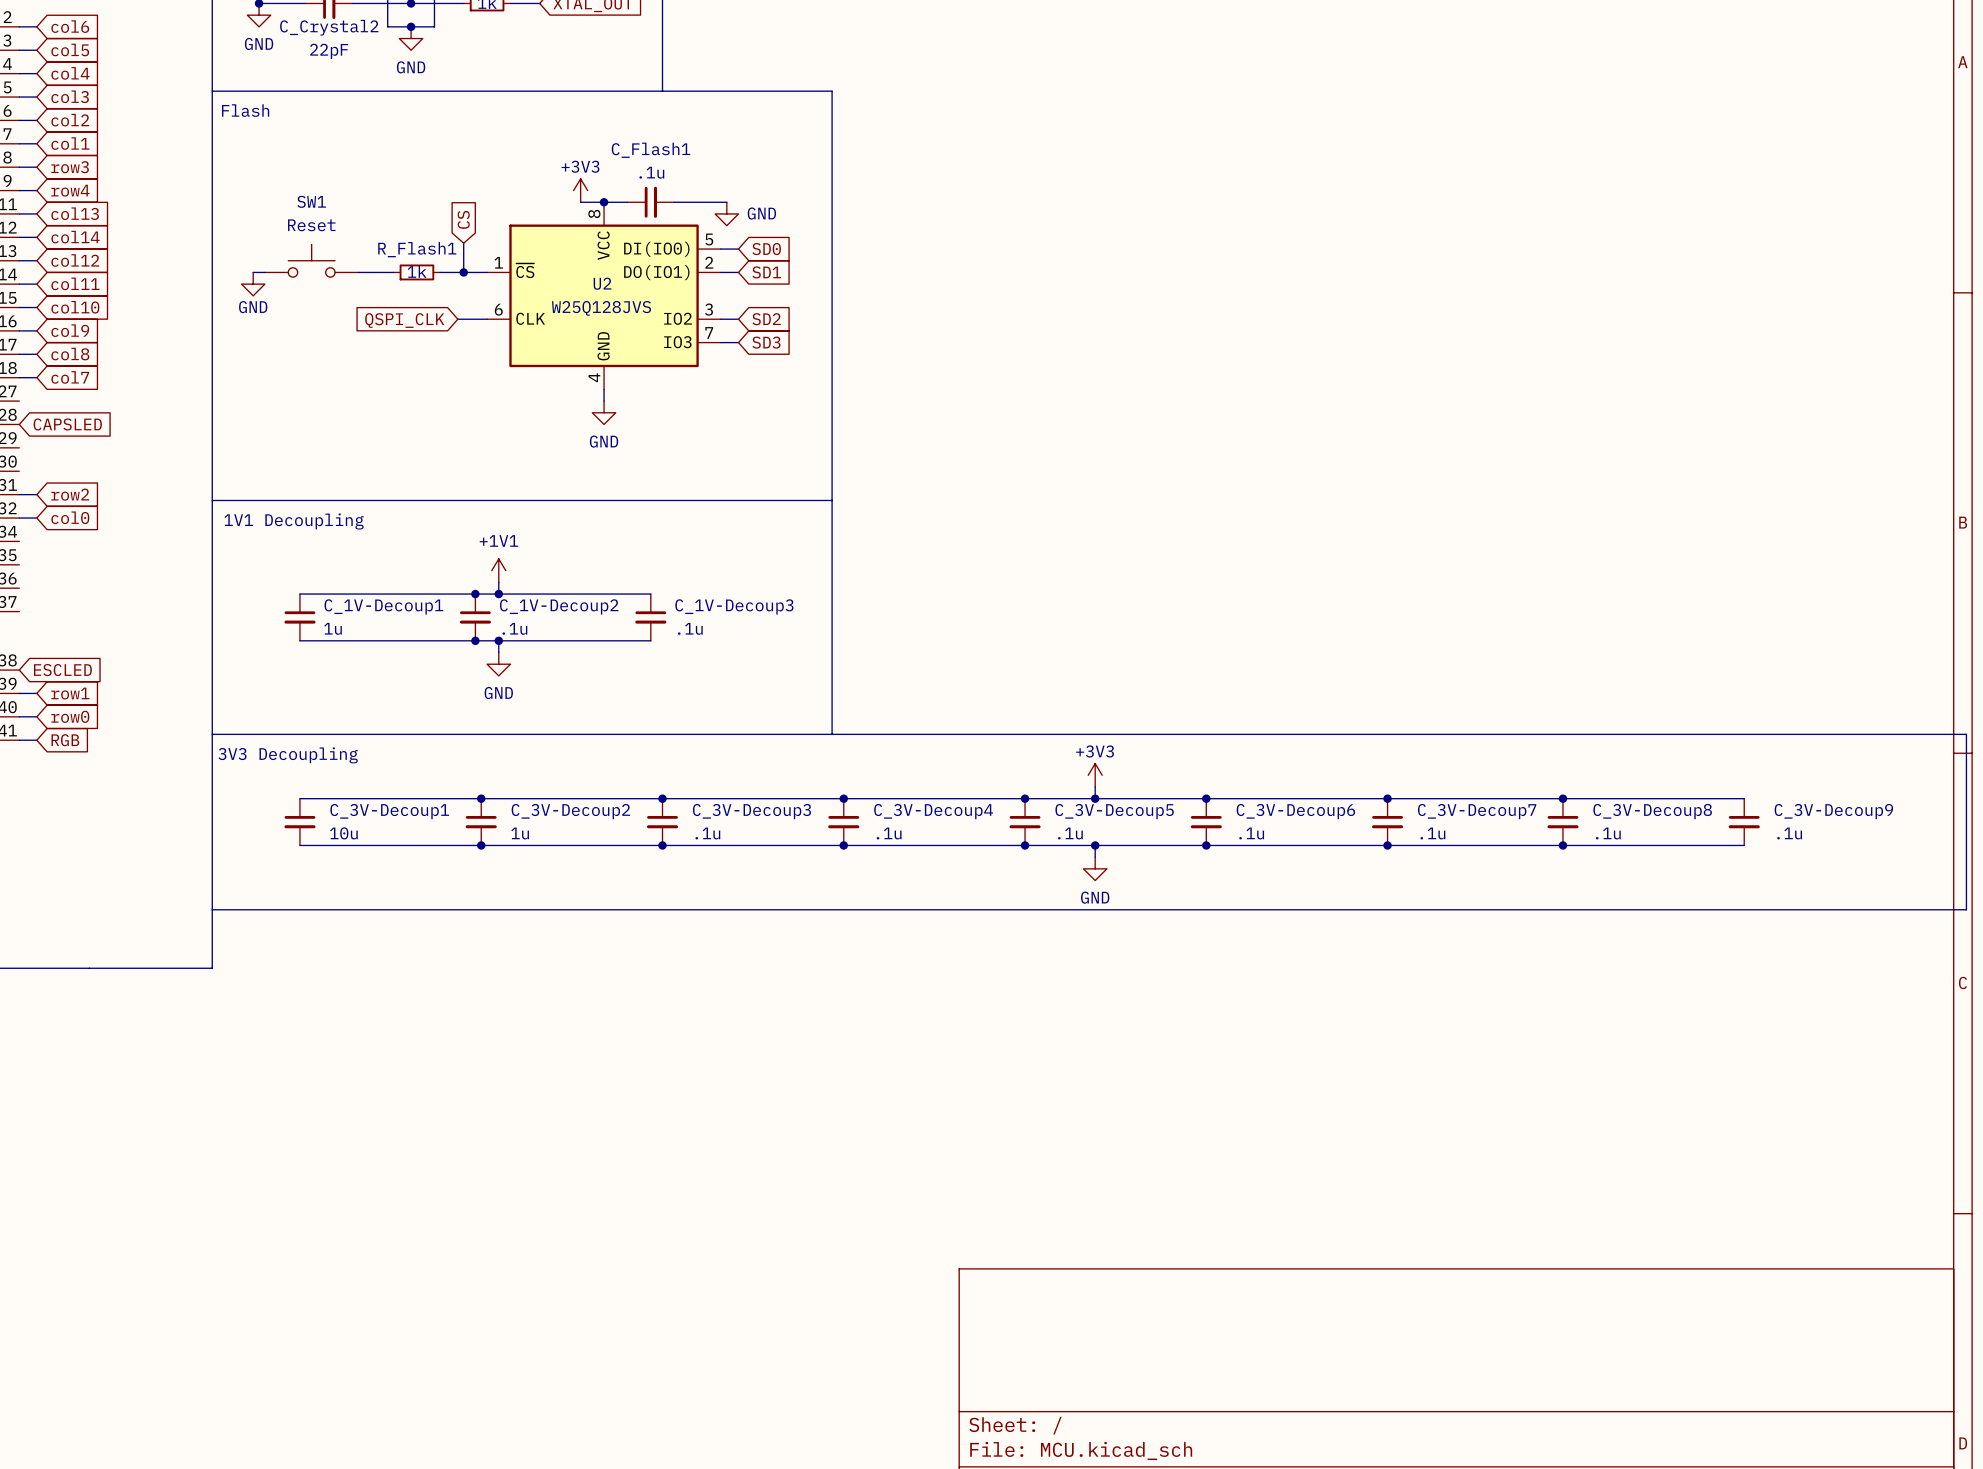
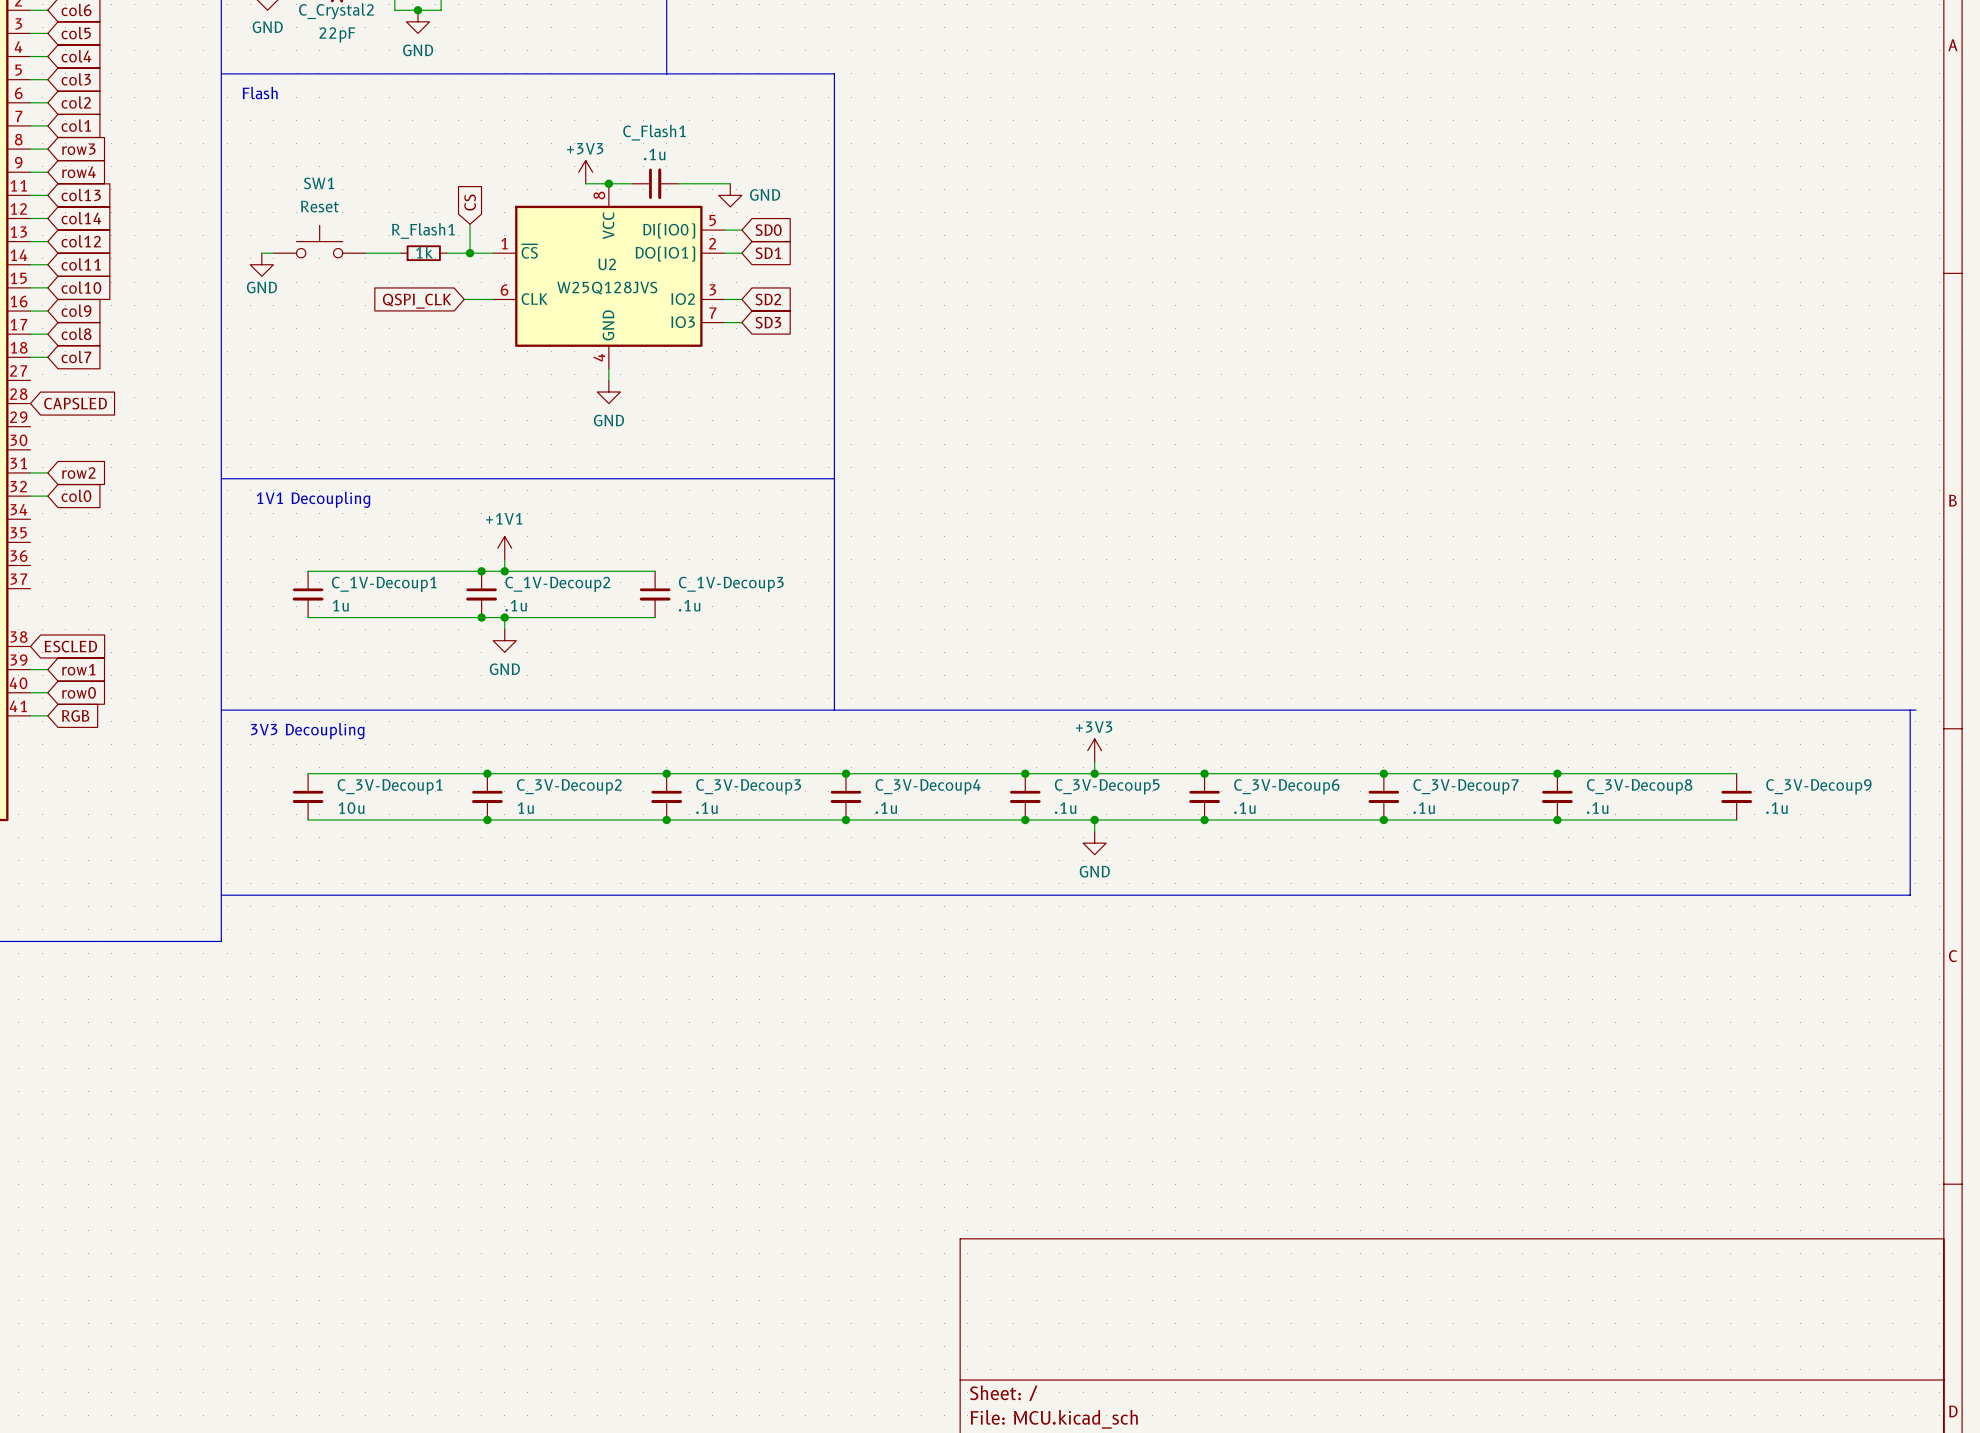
line: none -> (1910, 710) (1910, 895) (221, 895)
line: (1925, 734) (1966, 734) (1966, 909) (212, 909) -> none

